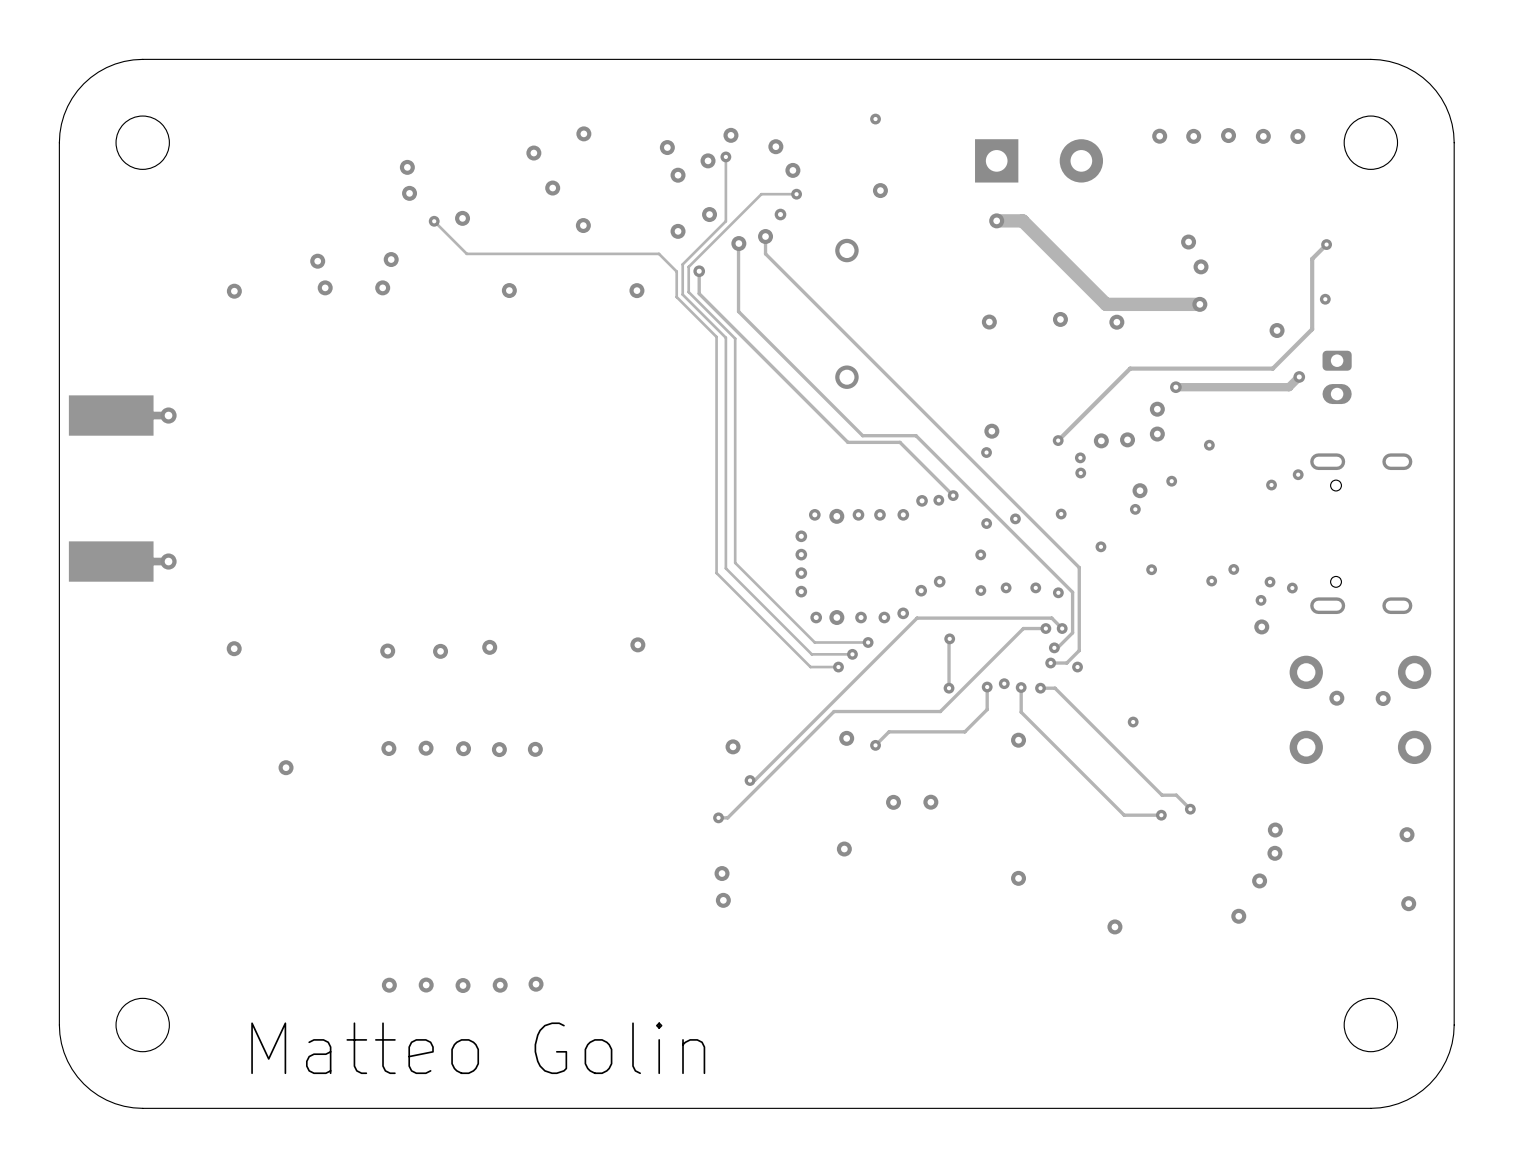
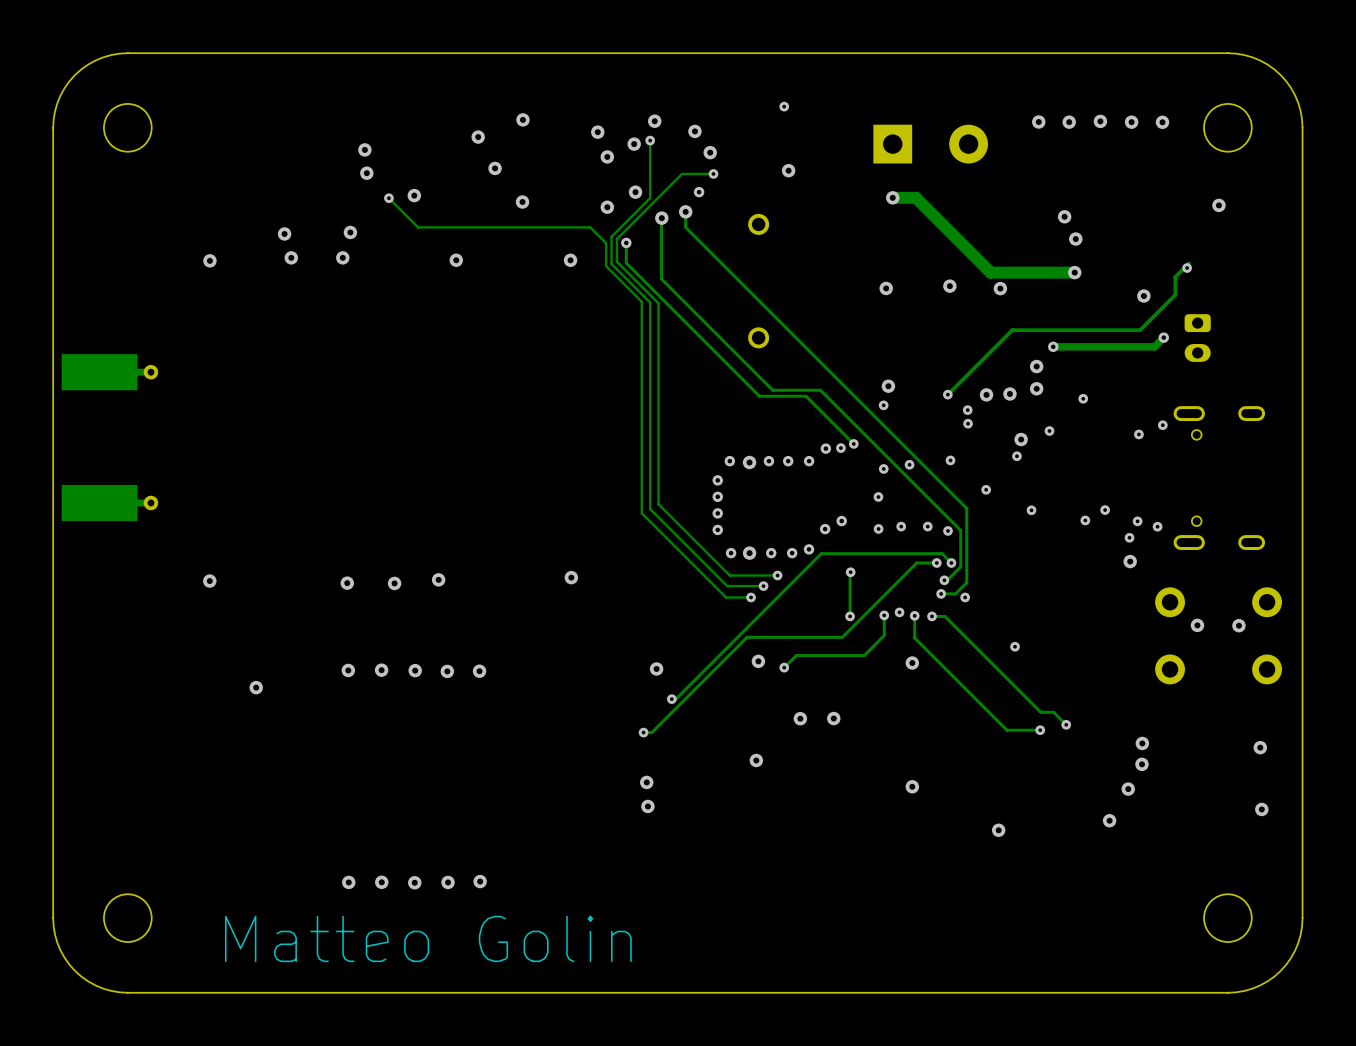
via: none -> (1218, 205)
track: (1326, 244) (1312, 258) (1312, 309) -> (1189, 263) (1175, 277)
via: (1326, 244) -> none

